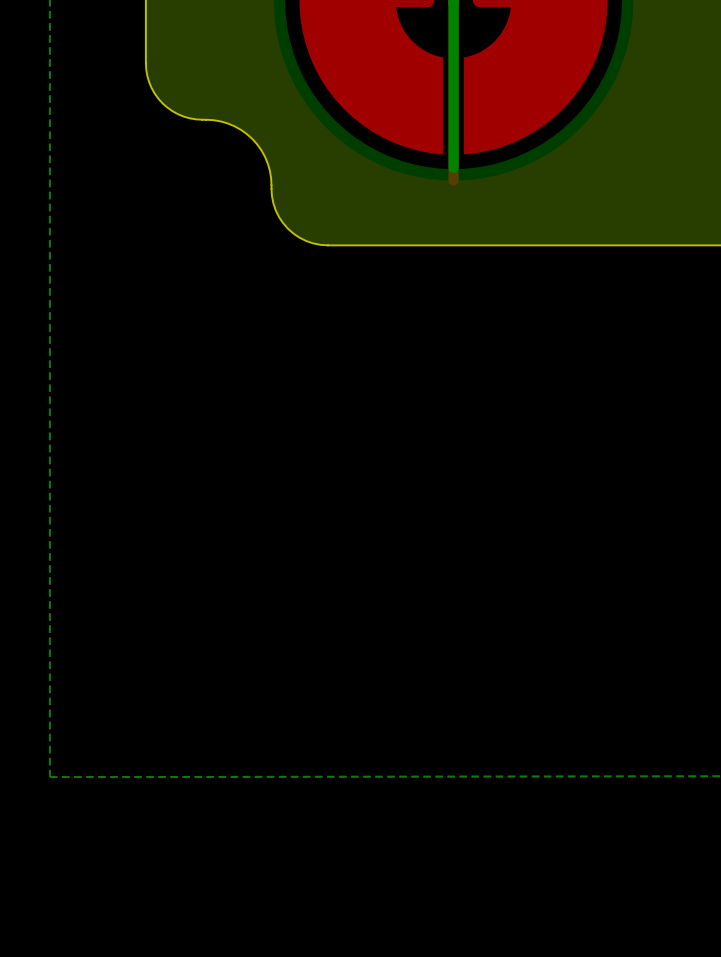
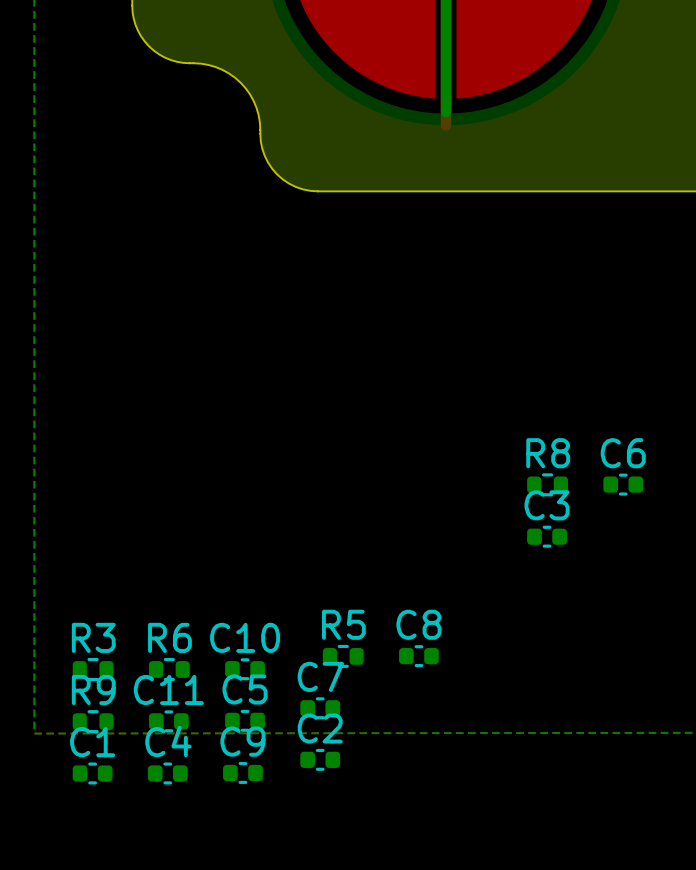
C6: none -> (623, 484)
R8: none -> (547, 484)
C3: none -> (547, 536)
R5: none -> (343, 656)
C8: none -> (418, 656)
C10: none -> (245, 669)
R3: none -> (93, 669)
R6: none -> (169, 669)
C7: none -> (320, 708)
C5: none -> (245, 720)
R9: none -> (93, 721)
C11: none -> (168, 721)
C2: none -> (320, 759)
C9: none -> (242, 772)
C1: none -> (92, 773)
C4: none -> (167, 773)

